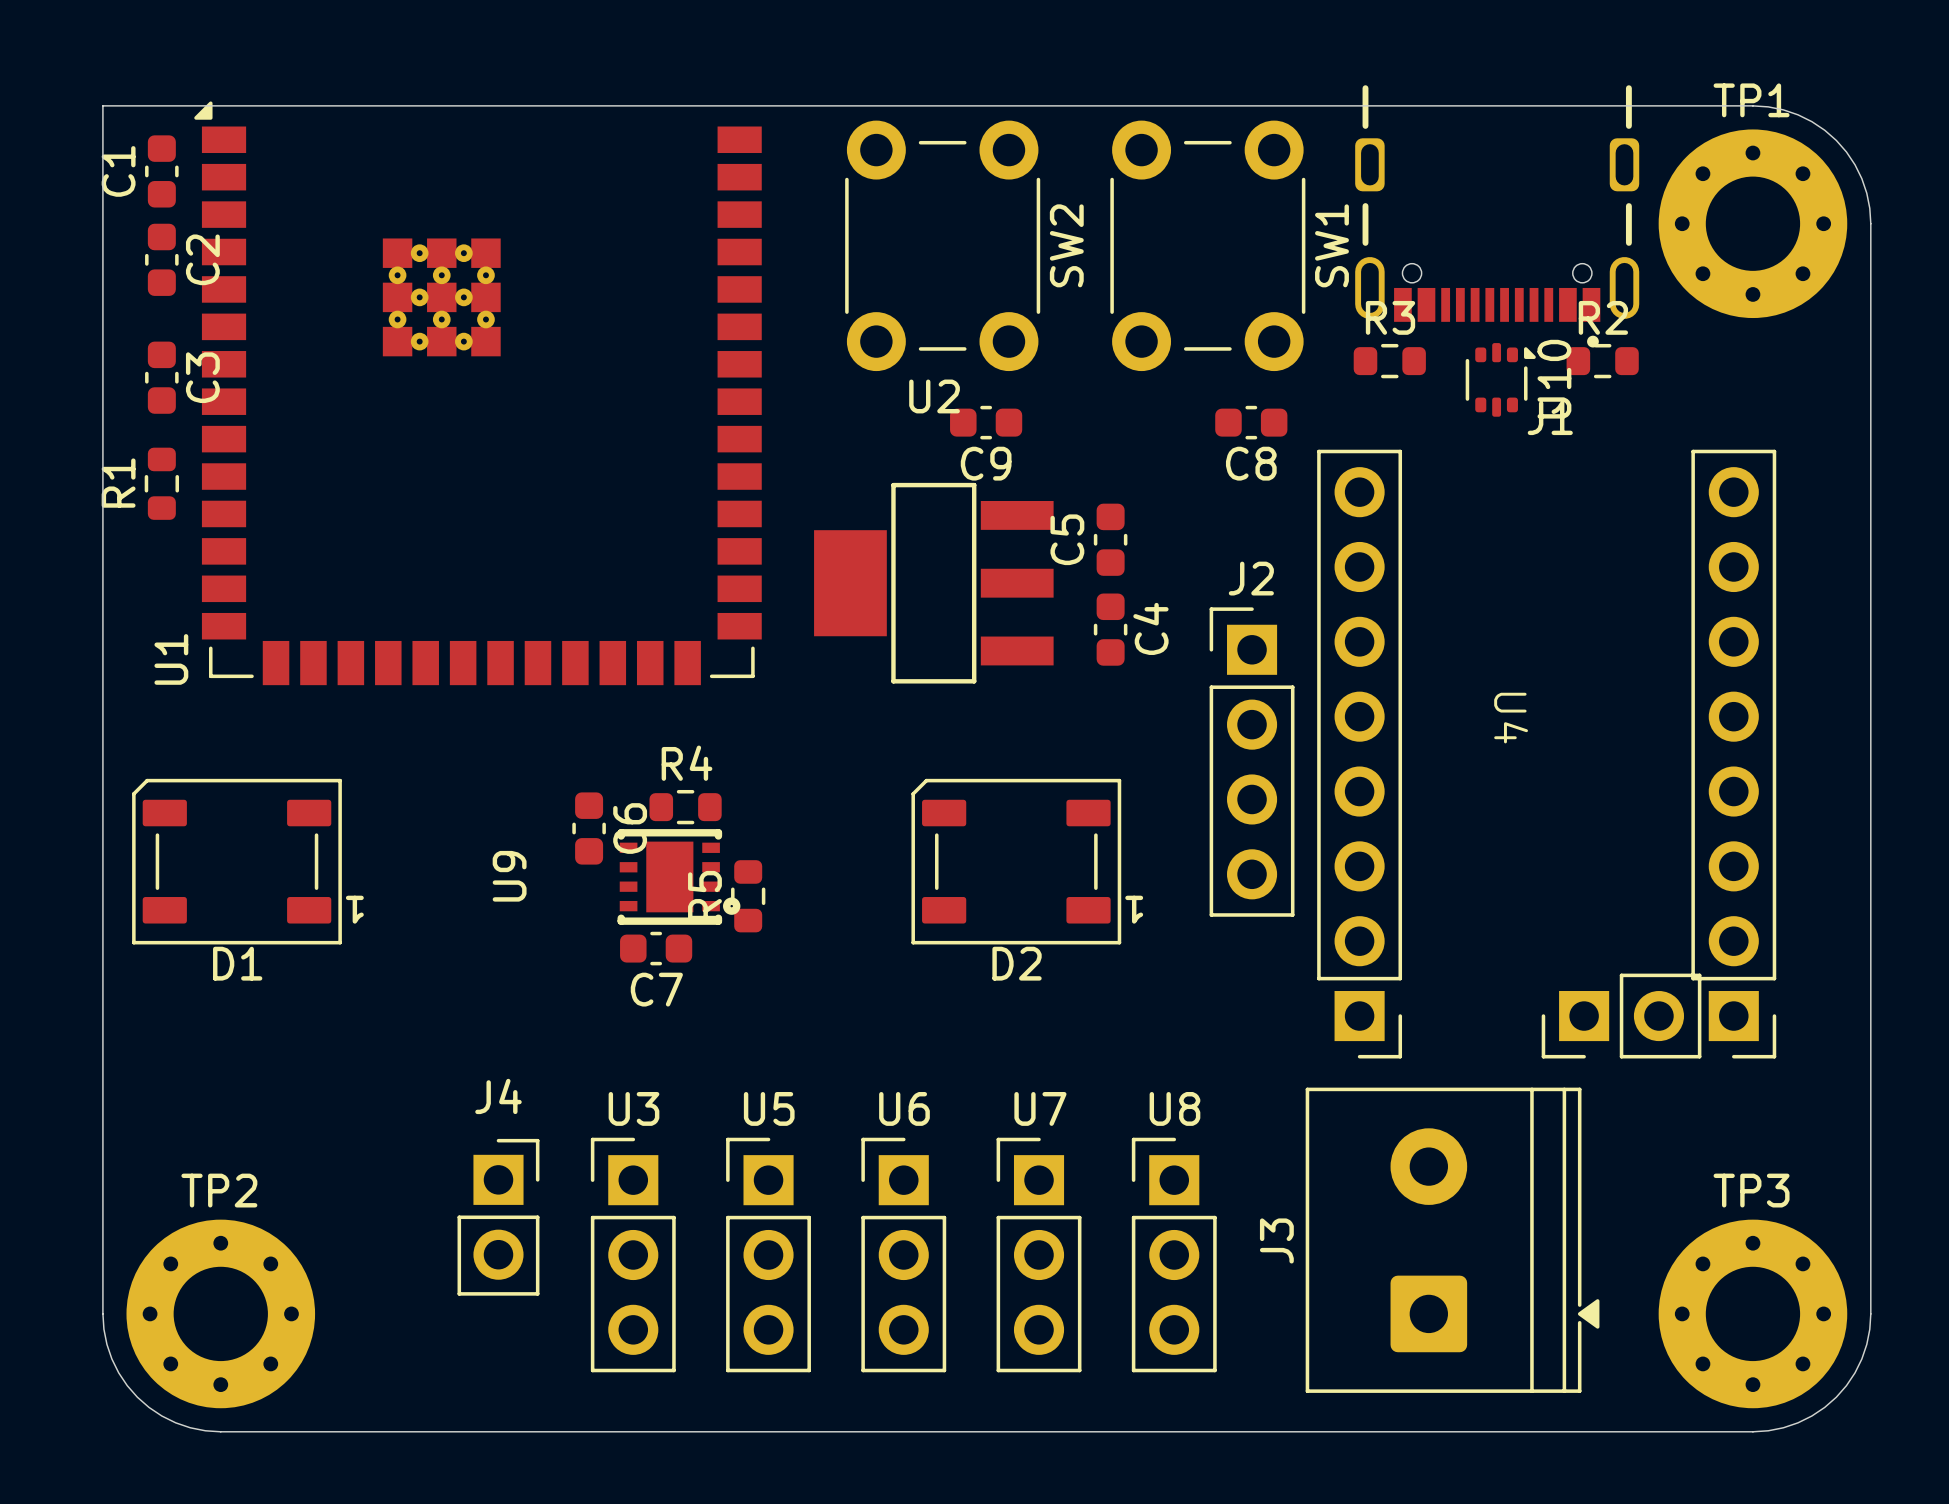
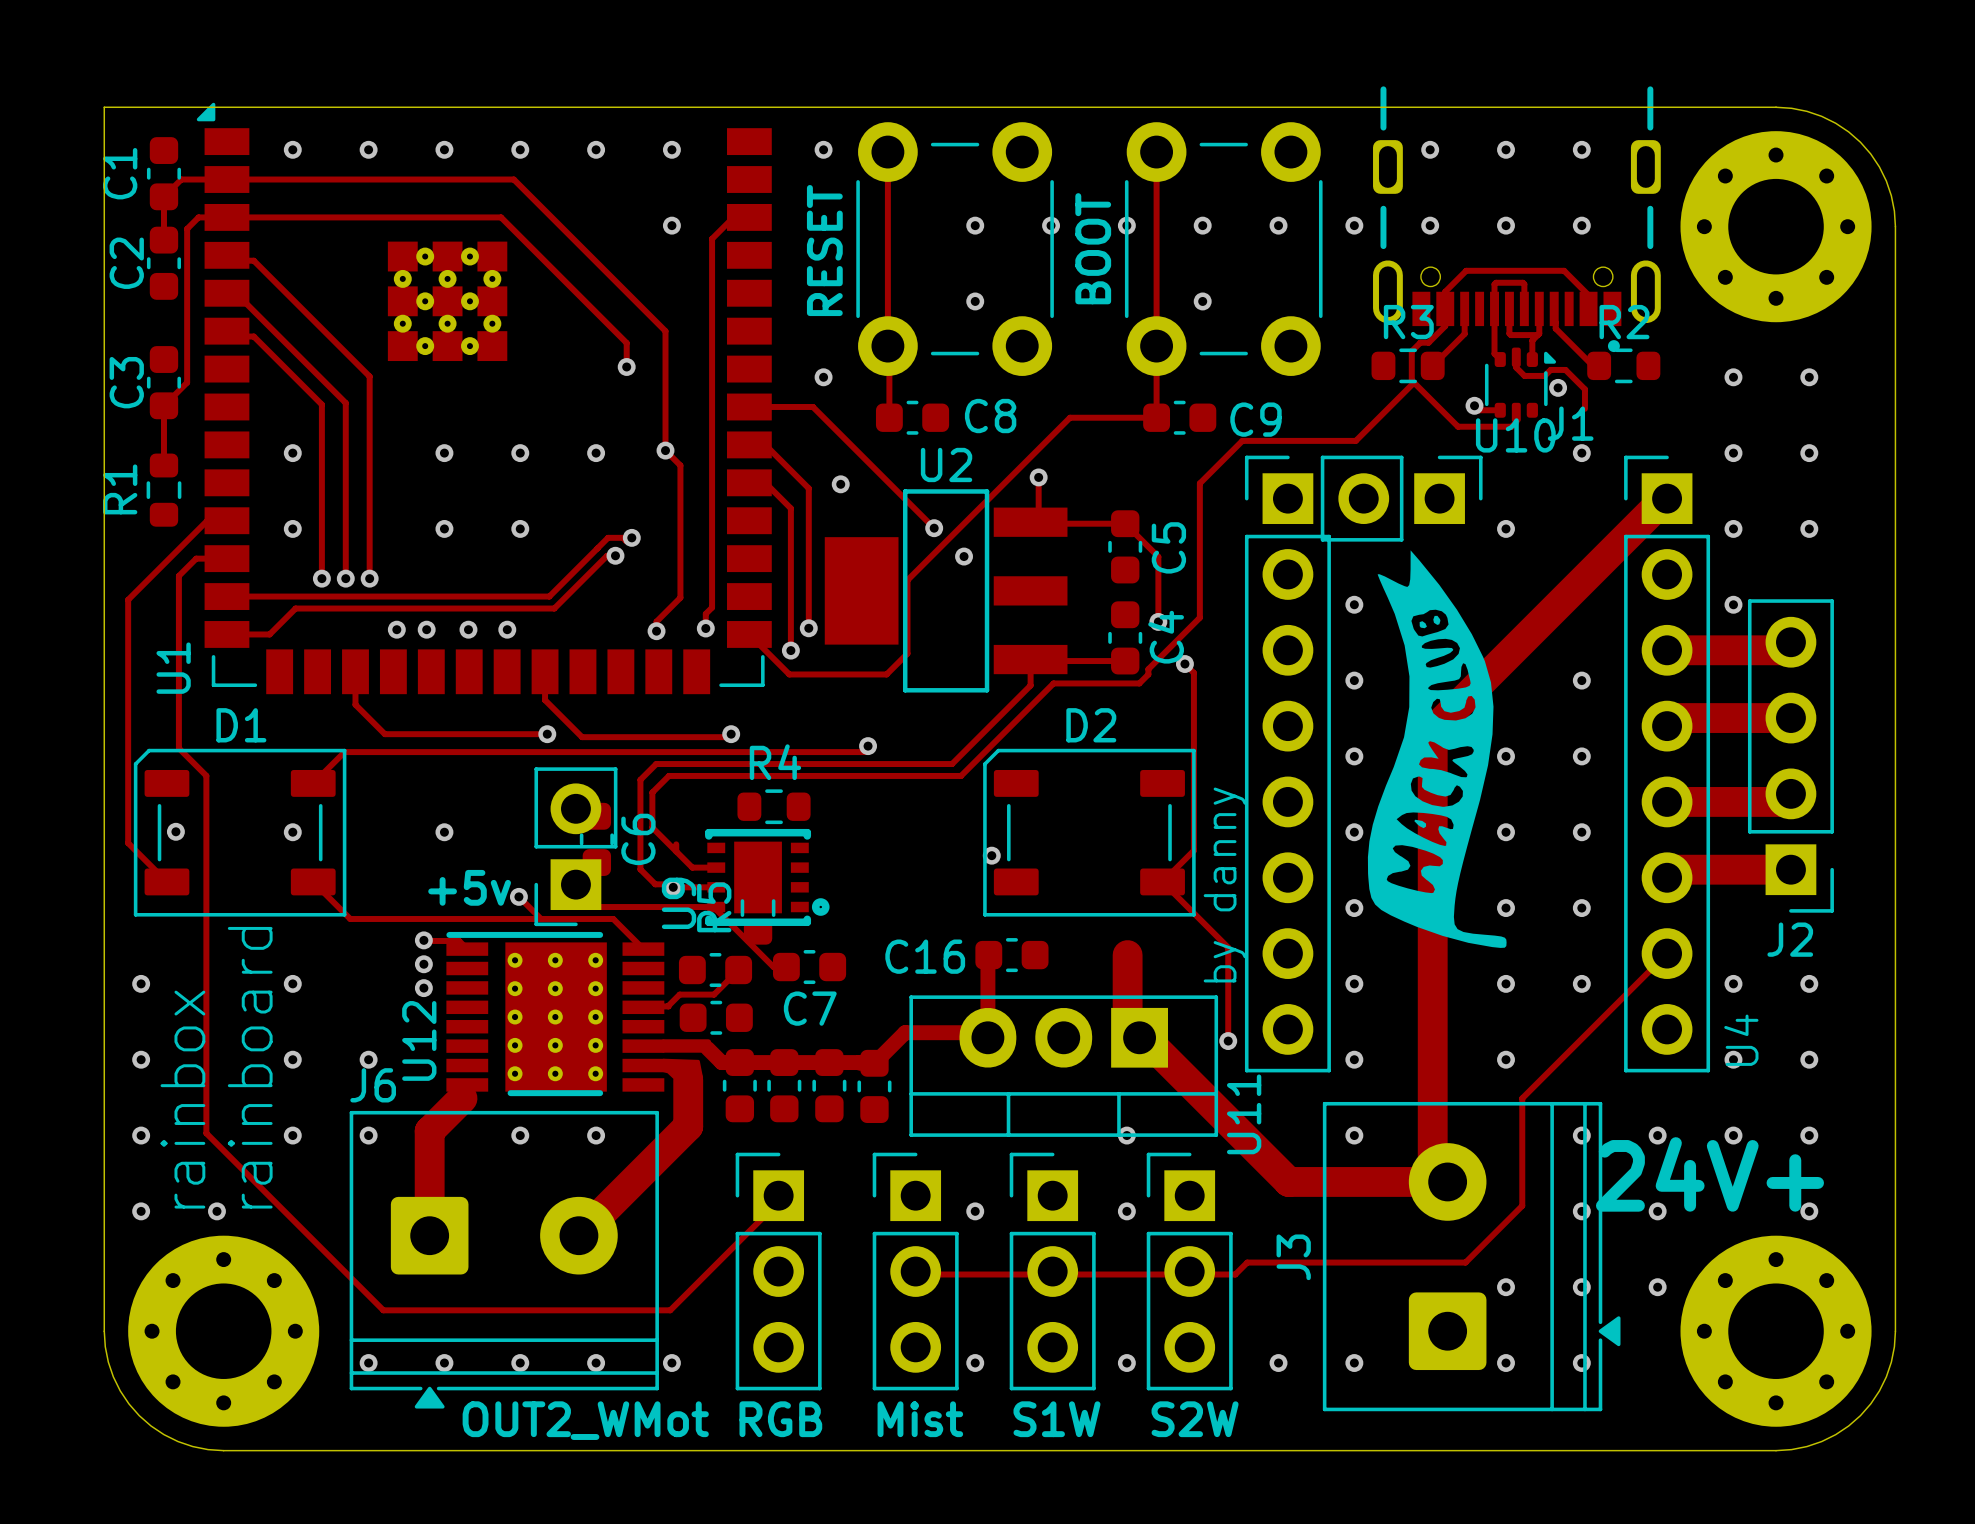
TP1 name: TP1 (1751, 100) -> none
via: none -> (292, 149)
via: none -> (368, 149)
via: none -> (444, 149)
via: none -> (520, 149)
via: none -> (596, 149)
via: none -> (671, 149)
via: none -> (823, 149)
via: none -> (1430, 149)
via: none -> (1506, 149)
via: none -> (1581, 149)
track: none -> (887, 155) (889, 417)
track: none -> (1156, 155) (1156, 417) (1070, 417) (907, 580) (907, 653) (886, 674) (789, 674) (749, 634)
track: none -> (749, 217) (733, 217) (712, 238) (712, 607) (705, 613) (705, 628)
via: none -> (671, 225)
via: none -> (975, 225)
via: none -> (1051, 225)
via: none -> (1126, 225)
via: none -> (1202, 225)
via: none -> (1278, 225)
via: none -> (1354, 225)
via: none -> (1430, 225)
via: none -> (1506, 225)
via: none -> (1581, 225)
track: none -> (163, 240) (163, 196) (181, 179) (513, 179) (665, 331) (665, 450) (680, 465) (680, 597) (656, 621) (656, 631)
SW2 name: SW2 (1066, 245) -> none
text: none -> BOOT (1093, 248)
SW1 name: SW1 (1331, 245) -> none
text: none -> RESET (824, 250)
track: none -> (225, 260) (253, 260) (369, 376) (369, 578)
C2 name position: C2 (202, 259) -> C2 (126, 263)
track: none -> (225, 298) (241, 298) (345, 403) (345, 578)
via: none -> (975, 301)
via: none -> (1202, 301)
track: none -> (1464, 308) (1464, 333) (1432, 365)
track: none -> (1509, 308) (1510, 335) (1537, 335)
track: none -> (1524, 308) (1522, 282) (1494, 284) (1494, 353) (1500, 359)
track: none -> (1539, 308) (1539, 333) (1532, 340) (1532, 359)
track: none -> (1554, 308) (1555, 328) (1592, 365) (1599, 365)
track: none -> (1588, 308) (1588, 295) (1564, 270) (1466, 270) (1445, 291) (1445, 326) (1428, 342) (1420, 342) (1411, 351) (1411, 380) (1458, 426) (1511, 426) (1516, 422) (1516, 412)
track: none -> (225, 336) (253, 336) (321, 404) (321, 578)
track: none -> (1516, 357) (1516, 367) (1524, 375) (1544, 375) (1550, 369) (1565, 369) (1584, 389) (1584, 408)
track: none -> (626, 366) (626, 343) (501, 217) (198, 217) (187, 228) (187, 382) (163, 405) (163, 465)
via: none -> (626, 366)
via: none -> (823, 377)
via: none -> (1733, 377)
via: none -> (1809, 377)
C3 name position: C3 (202, 377) -> C3 (126, 382)
track: none -> (1414, 382) (1355, 440) (1242, 440) (1199, 483) (1199, 617) (1148, 669) (1148, 674) (1139, 683) (1053, 683) (961, 775) (668, 775) (652, 792) (652, 827) (692, 867) (716, 867)
U10 name rotation: 0° (1554, 379) -> 90° clockwise (1515, 435)
via: none -> (1558, 387)
U2 name position: U2 (934, 396) -> U2 (946, 464)
track: none -> (1474, 405) (1478, 410) (1500, 410)
via: none -> (1474, 405)
track: none -> (749, 406) (812, 406) (934, 528)
C9 position: (986, 422) -> (1179, 417)
C8 position: (1251, 422) -> (912, 417)
track: none -> (749, 444) (765, 444) (808, 488) (808, 628)
via: none -> (665, 450)
via: none -> (292, 453)
via: none -> (444, 453)
via: none -> (520, 453)
via: none -> (596, 453)
via: none -> (1581, 453)
via: none -> (1733, 453)
via: none -> (1809, 453)
C9 name position: C9 (986, 463) -> C9 (1255, 419)
C8 name position: C8 (1251, 463) -> C8 (990, 416)
track: none -> (1038, 477) (1038, 514) (1030, 522) (1032, 523) (1125, 523) (1158, 556) (1158, 621)
via: none -> (1038, 477)
track: none -> (749, 482) (765, 482) (790, 508) (790, 650)
via: none -> (840, 484)
track: none -> (1667, 498) (1664, 498) (1432, 730) (1432, 1181) (1288, 1181) (1127, 1020) (1127, 955)
track: none -> (226, 520) (207, 520) (128, 599) (128, 843) (166, 881)
via: none -> (934, 528)
via: none -> (292, 528)
via: none -> (444, 528)
via: none -> (520, 528)
via: none -> (1506, 528)
via: none -> (1733, 528)
via: none -> (1809, 528)
track: none -> (631, 537) (625, 540) (622, 537) (608, 537) (549, 596) (226, 596)
via: none -> (631, 537)
C5 name position: C5 (1067, 539) -> C5 (1168, 547)
drawing: none -> [1367, 550, 1507, 948]
track: none -> (615, 555) (607, 555) (554, 608) (295, 608) (269, 634) (226, 634)
via: none -> (615, 555)
via: none -> (964, 556)
track: none -> (226, 558) (196, 558) (178, 575) (178, 748) (206, 775) (206, 1133) (383, 1310) (670, 1310) (781, 1198)
via: none -> (321, 578)
via: none -> (345, 578)
via: none -> (369, 578)
via: none -> (1354, 604)
via: none -> (1733, 604)
via: none -> (1158, 621)
via: none -> (705, 628)
via: none -> (808, 628)
via: none -> (396, 629)
via: none -> (426, 629)
via: none -> (468, 629)
via: none -> (507, 629)
via: none -> (656, 631)
track: none -> (1790, 642) (1782, 650) (1667, 650)
via: none -> (790, 650)
track: none -> (1125, 661) (1030, 659) (1030, 685) (952, 764) (656, 764) (640, 779) (640, 869) (655, 884) (670, 884) (673, 887) (716, 887)
track: none -> (1184, 664) (1193, 673) (1193, 850) (1162, 881) (1228, 947) (1228, 1041)
via: none -> (1184, 664)
track: none -> (355, 671) (355, 704) (384, 734) (547, 734)
track: none -> (545, 671) (545, 700) (582, 737) (728, 737) (731, 734)
via: none -> (1354, 680)
via: none -> (1581, 680)
track: none -> (1790, 718) (1675, 718) (1667, 726)
U4 name position: U4 (1511, 718) -> U4 (1741, 1040)
via: none -> (547, 734)
via: none -> (731, 734)
track: none -> (868, 746) (864, 752) (344, 752) (313, 783)
via: none -> (868, 746)
via: none -> (1354, 756)
via: none -> (1506, 756)
via: none -> (1581, 756)
U4 rotation: 0° (1546, 754) -> 180° (1477, 764)
J2 rotation: 0° (1252, 762) -> 180° (1790, 755)
J2 position: (1252, 762) -> (1790, 755)
track: none -> (1790, 793) (1782, 801) (1667, 801)
R4 position: (685, 807) -> (774, 806)
via: none -> (175, 831)
via: none -> (292, 832)
via: none -> (444, 832)
via: none -> (1354, 832)
via: none -> (1506, 832)
via: none -> (1581, 832)
track: none -> (676, 844) (676, 851)
part: none -> (575, 846)
via: none -> (991, 855)
track: none -> (1790, 869) (1675, 869) (1667, 877)
D1 position: (236, 861) -> (240, 832)
D2 position: (1016, 861) -> (1089, 832)
track: none -> (313, 881) (350, 918) (613, 918) (643, 949)
track: none -> (575, 884) (598, 907) (716, 907) (716, 909) (773, 967) (786, 967)
text: none -> by danny (1225, 884)
via: none -> (673, 887)
text: none -> +5v (469, 887)
U9 name position: U9 (509, 876) -> U9 (679, 903)
U9 position: (678, 876) -> (767, 877)
track: none -> (518, 896) (541, 918)
via: none -> (518, 896)
via: none -> (1354, 908)
via: none -> (1506, 908)
via: none -> (1581, 908)
D1 text: 1 (354, 909) -> none
D2 text: 1 (1134, 909) -> none
track: none -> (423, 940) (459, 940) (467, 949)
via: none -> (423, 940)
track: none -> (1667, 953) (1522, 1098) (1522, 1205) (1465, 1262) (1247, 1262) (1235, 1274) (918, 1274)
track: none -> (988, 955) (987, 1032) (905, 1032) (874, 1063) (721, 1062) (707, 1048)
C16: none -> (1011, 955)
C7 position: (656, 948) -> (809, 967)
via: none -> (423, 964)
part: none -> (715, 970)
track: none -> (738, 970) (714, 994) (679, 994) (668, 1006) (643, 1007)
D1 name position: D1 (237, 963) -> D1 (241, 725)
D2 name position: D2 (1017, 963) -> D2 (1091, 725)
via: none -> (141, 983)
via: none -> (292, 983)
via: none -> (1354, 983)
via: none -> (1506, 983)
via: none -> (1581, 983)
via: none -> (1733, 983)
via: none -> (1809, 983)
via: none -> (423, 988)
U12: none -> (555, 1014)
part: none -> (716, 1017)
drawing: none -> [660, 1039, 712, 1080]
via: none -> (1228, 1041)
via: none -> (141, 1059)
via: none -> (292, 1059)
via: none -> (368, 1059)
via: none -> (1354, 1059)
via: none -> (1506, 1059)
via: none -> (1733, 1059)
via: none -> (1809, 1059)
U11: none -> (1063, 1066)
text: none -> rainboard (250, 1067)
track: none -> (688, 1079) (688, 1126) (578, 1235)
part: none -> (739, 1085)
part: none -> (784, 1085)
part: none -> (829, 1085)
part: none -> (874, 1086)
track: none -> (462, 1098) (429, 1131) (429, 1235)
text: none -> rainbox (182, 1099)
U5 name: U5 (769, 1108) -> none
U6 name: U6 (904, 1108) -> none
U7 name: U7 (1040, 1108) -> none
U8 name: U8 (1174, 1108) -> none
via: none -> (141, 1135)
via: none -> (292, 1135)
via: none -> (368, 1135)
via: none -> (520, 1135)
via: none -> (596, 1135)
via: none -> (1126, 1135)
via: none -> (1354, 1135)
via: none -> (1581, 1135)
via: none -> (1657, 1135)
via: none -> (1733, 1135)
via: none -> (1809, 1135)
text: none -> 24V+ (1709, 1174)
TP2 name: TP2 (219, 1190) -> none
TP3 name: TP3 (1751, 1190) -> none
via: none -> (141, 1211)
via: none -> (216, 1211)
via: none -> (975, 1211)
via: none -> (1126, 1211)
via: none -> (1581, 1211)
via: none -> (1657, 1211)
via: none -> (1809, 1211)
J4: (498, 1217) -> none
J6: none -> (504, 1259)
U3: (633, 1255) -> none
via: none -> (1506, 1287)
via: none -> (1581, 1287)
via: none -> (1657, 1287)
via: none -> (368, 1363)
via: none -> (444, 1363)
via: none -> (520, 1363)
via: none -> (596, 1363)
via: none -> (671, 1363)
via: none -> (975, 1363)
via: none -> (1126, 1363)
via: none -> (1278, 1363)
via: none -> (1354, 1363)
via: none -> (1506, 1363)
via: none -> (1581, 1363)
text: none -> RGB (780, 1419)
text: none -> Mist (920, 1419)
text: none -> S1W (1056, 1419)
text: none -> S2W (1195, 1419)
text: none -> OUT2_WMot (585, 1420)

